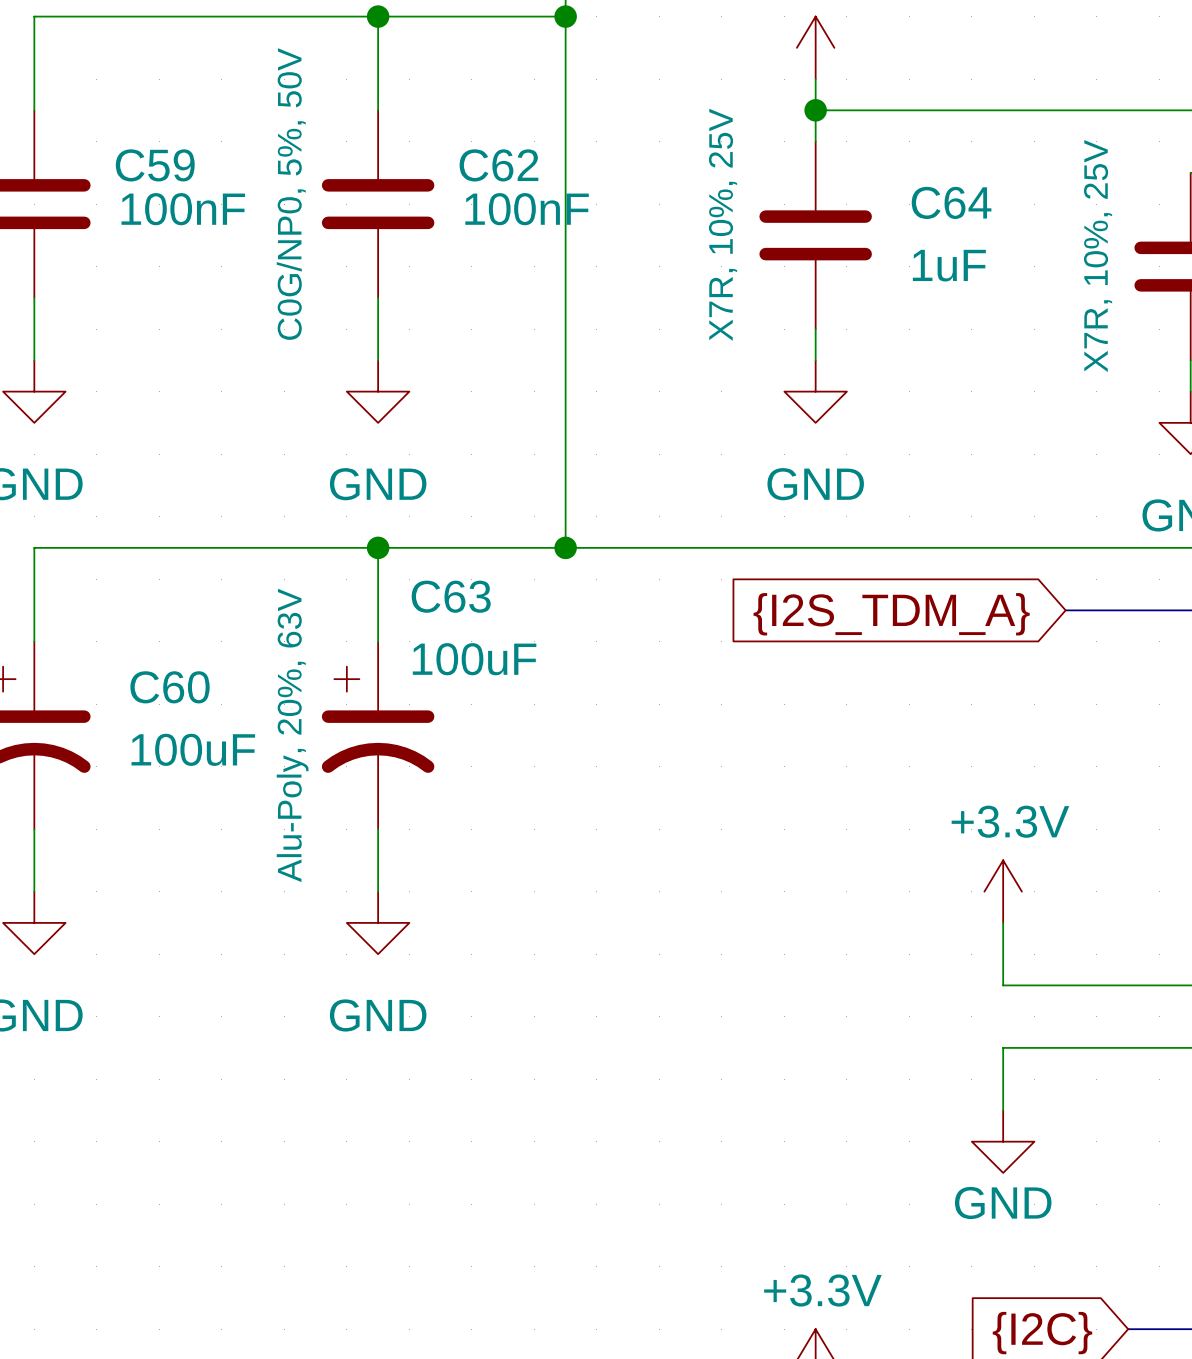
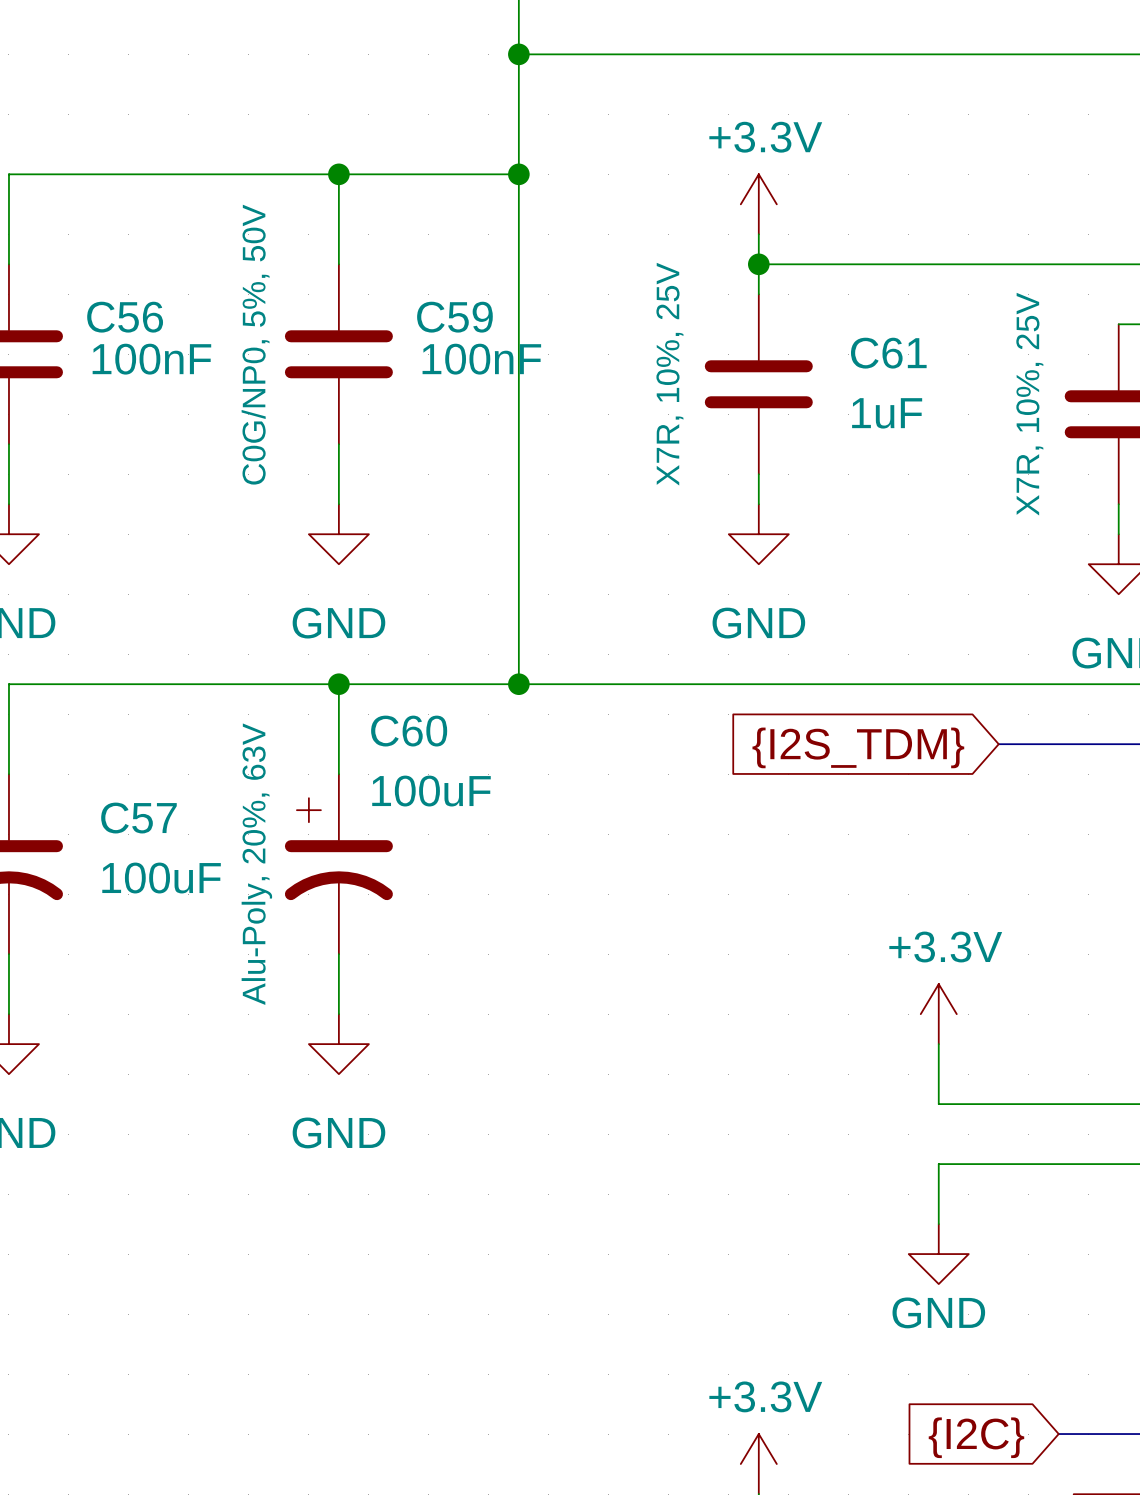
C59 name: C59 (155, 165) -> C56 (125, 317)
C62 name: C62 (498, 165) -> C59 (454, 317)
C64 name: C64 (951, 202) -> C61 (888, 353)
C63 name: C63 (451, 596) -> C60 (409, 731)
global label: {I2S_TDM_A} (891, 614) -> {I2S_TDM} (858, 747)
C60 name: C60 (170, 687) -> C57 (138, 818)

